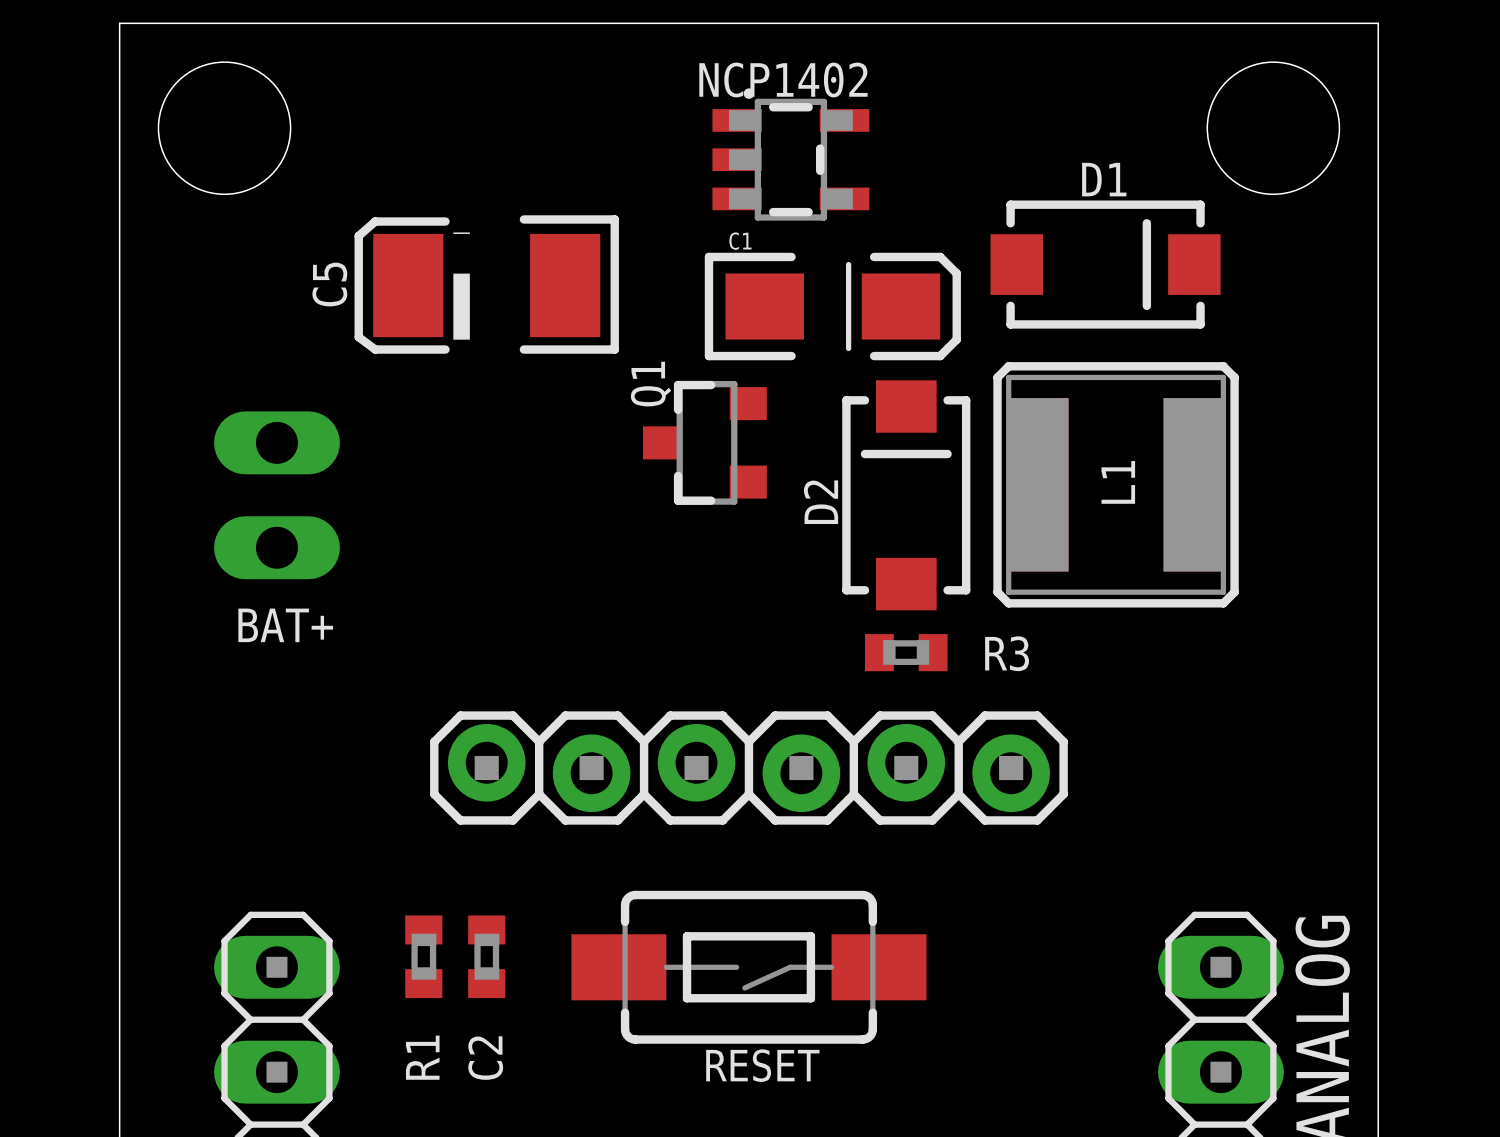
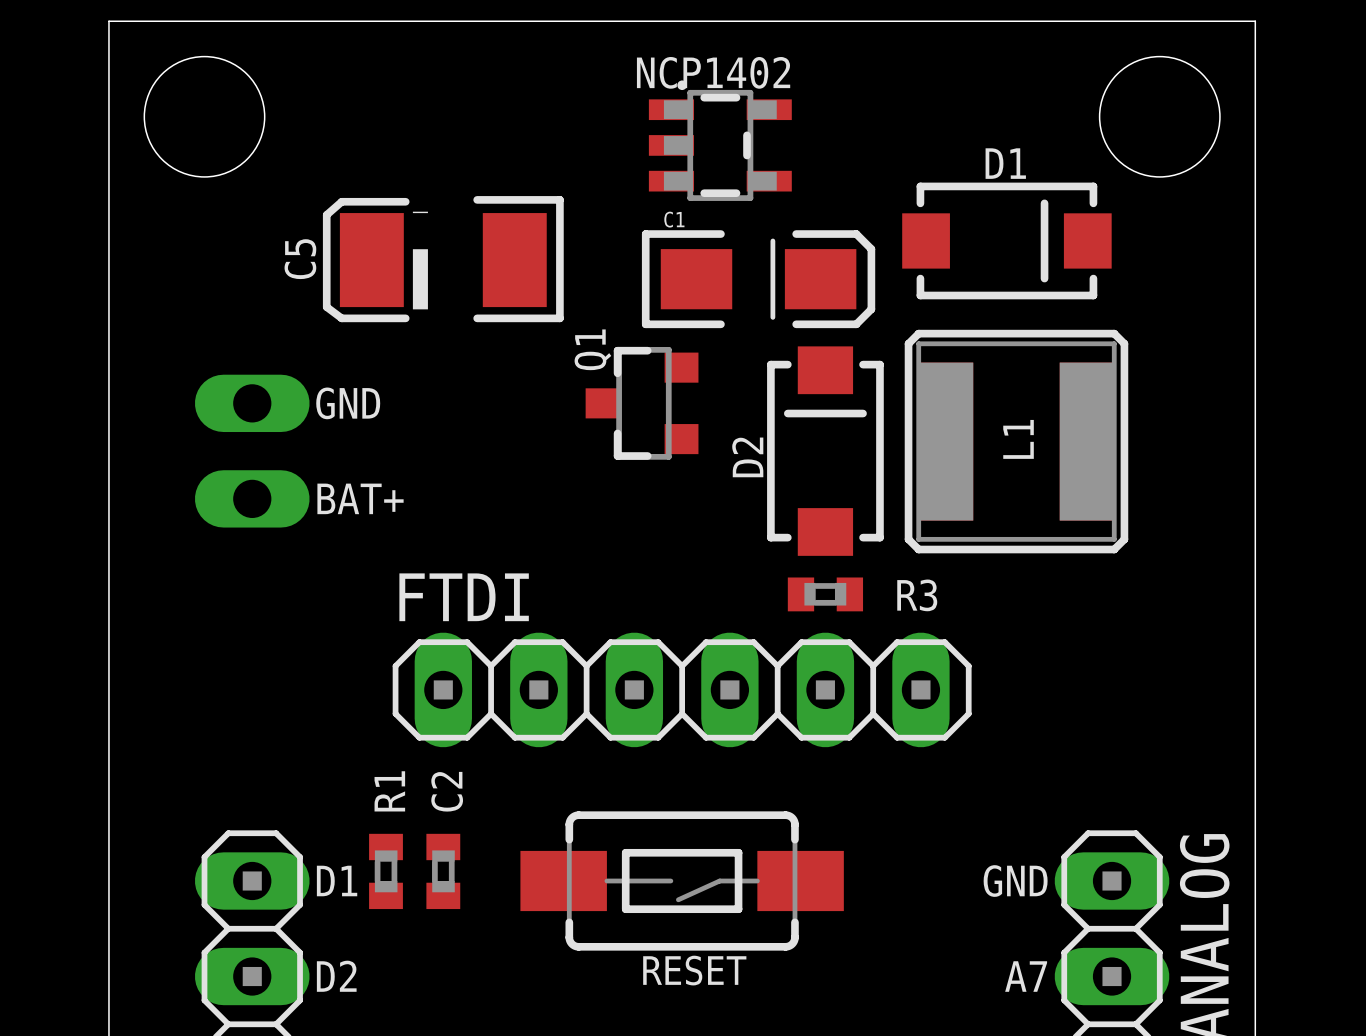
text: none -> GND (348, 403)
text position: BAT+ (285, 625) -> BAT+ (360, 498)
FTDI: none -> (682, 689)
part: (748, 768) -> none
text: none -> D1 (337, 880)
text: none -> GND (1015, 881)
R1 name position: R1 (422, 1057) -> R1 (389, 791)
C2 name position: C2 (485, 1058) -> C2 (447, 791)
text: none -> D2 (336, 976)
text: none -> A7 (1026, 976)

